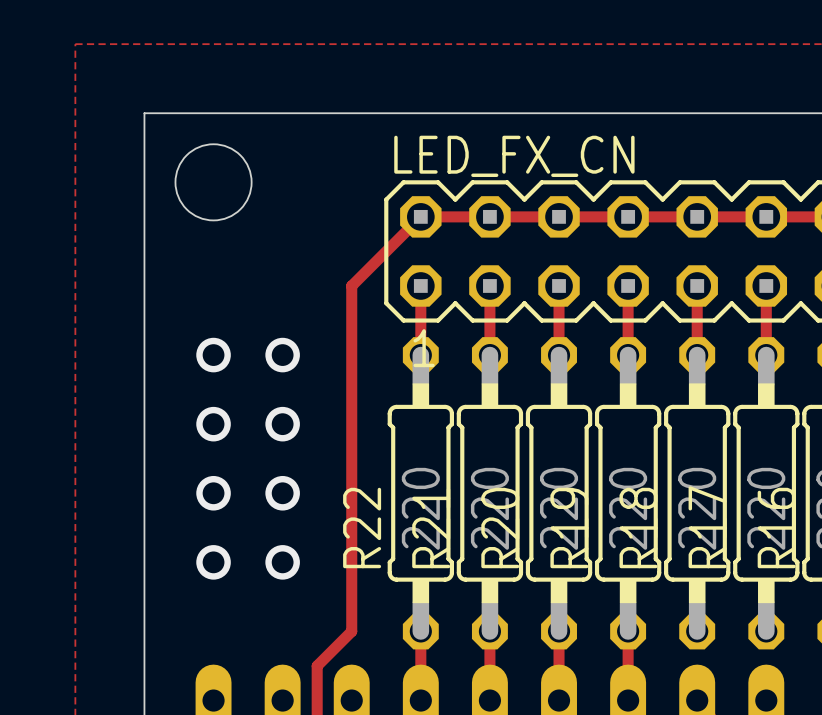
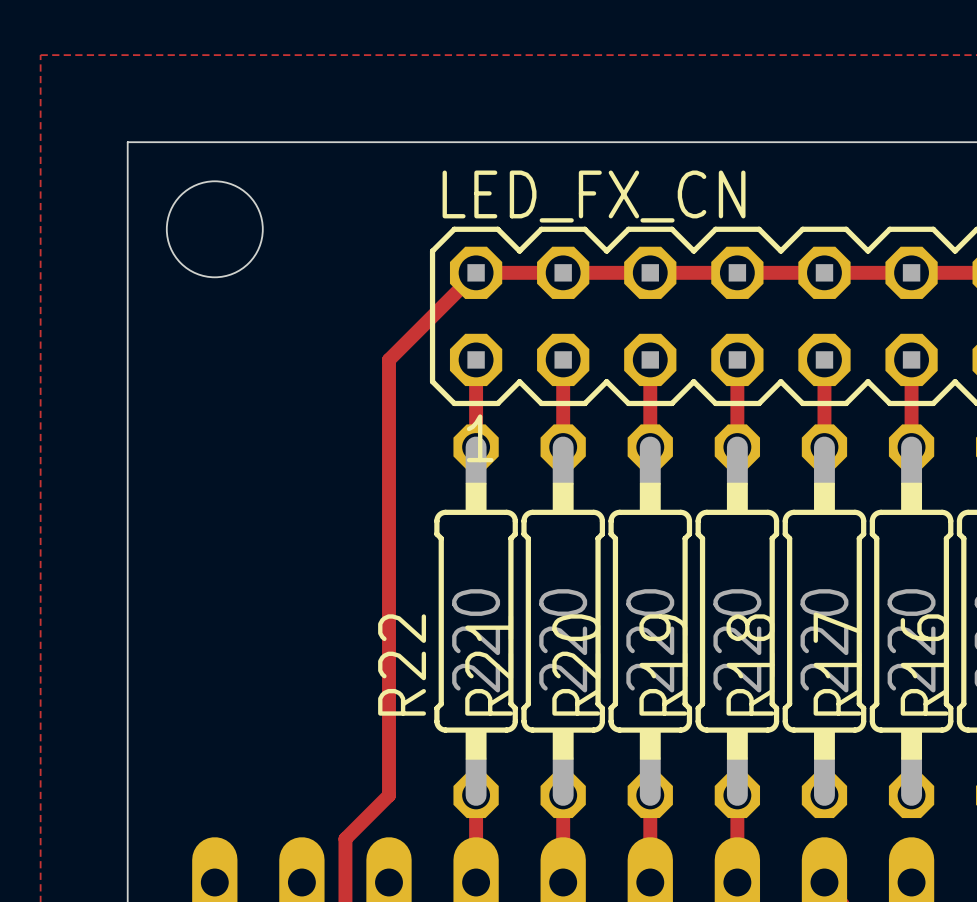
via: (213, 355) -> none
via: (282, 355) -> none
via: (213, 424) -> none
via: (282, 424) -> none
via: (213, 493) -> none
via: (282, 493) -> none
via: (213, 562) -> none
via: (282, 562) -> none

